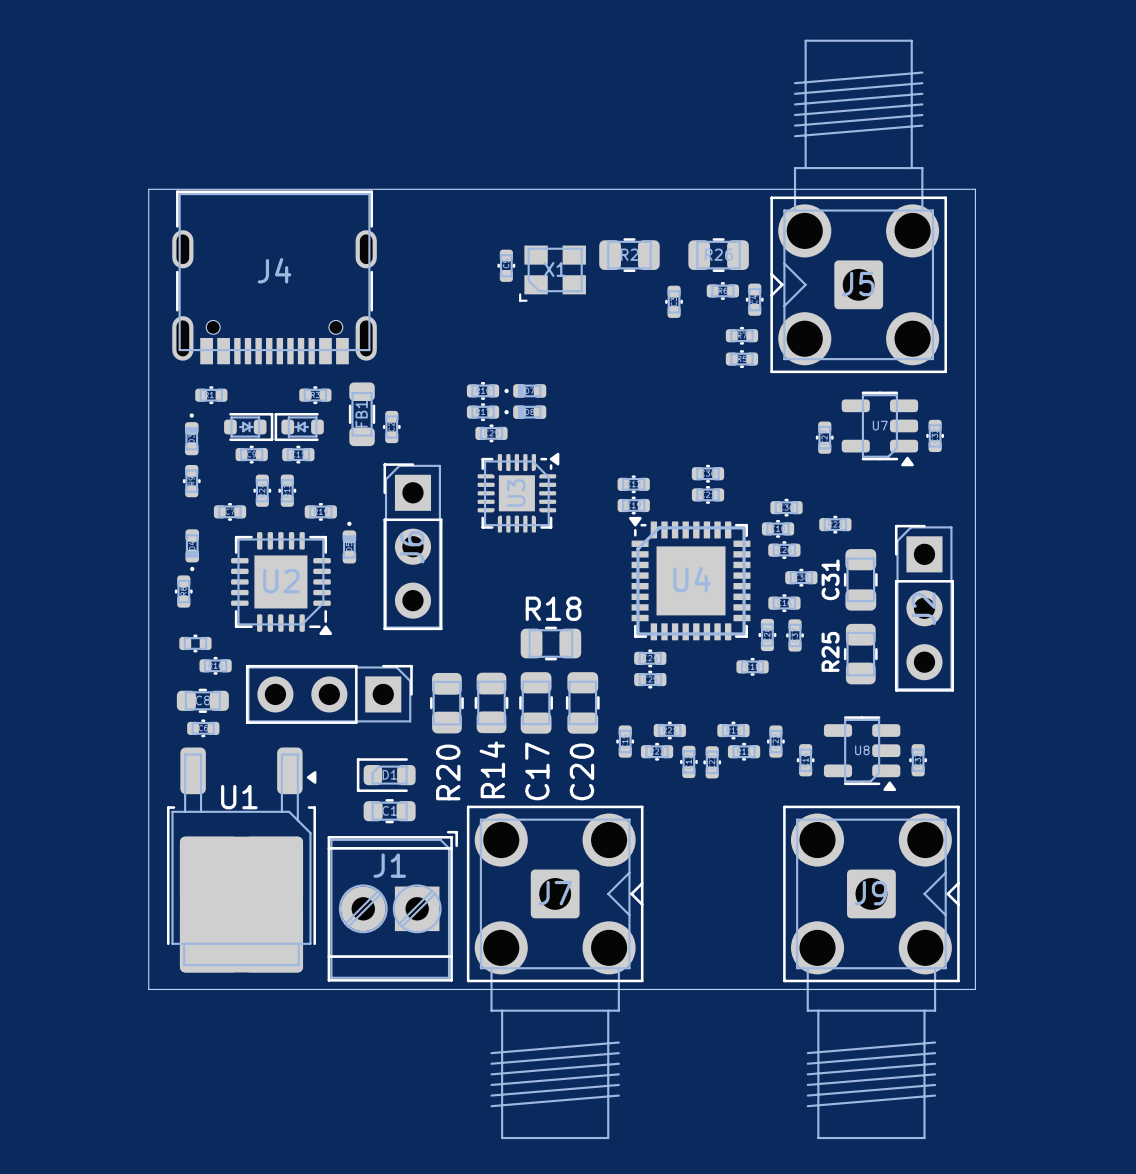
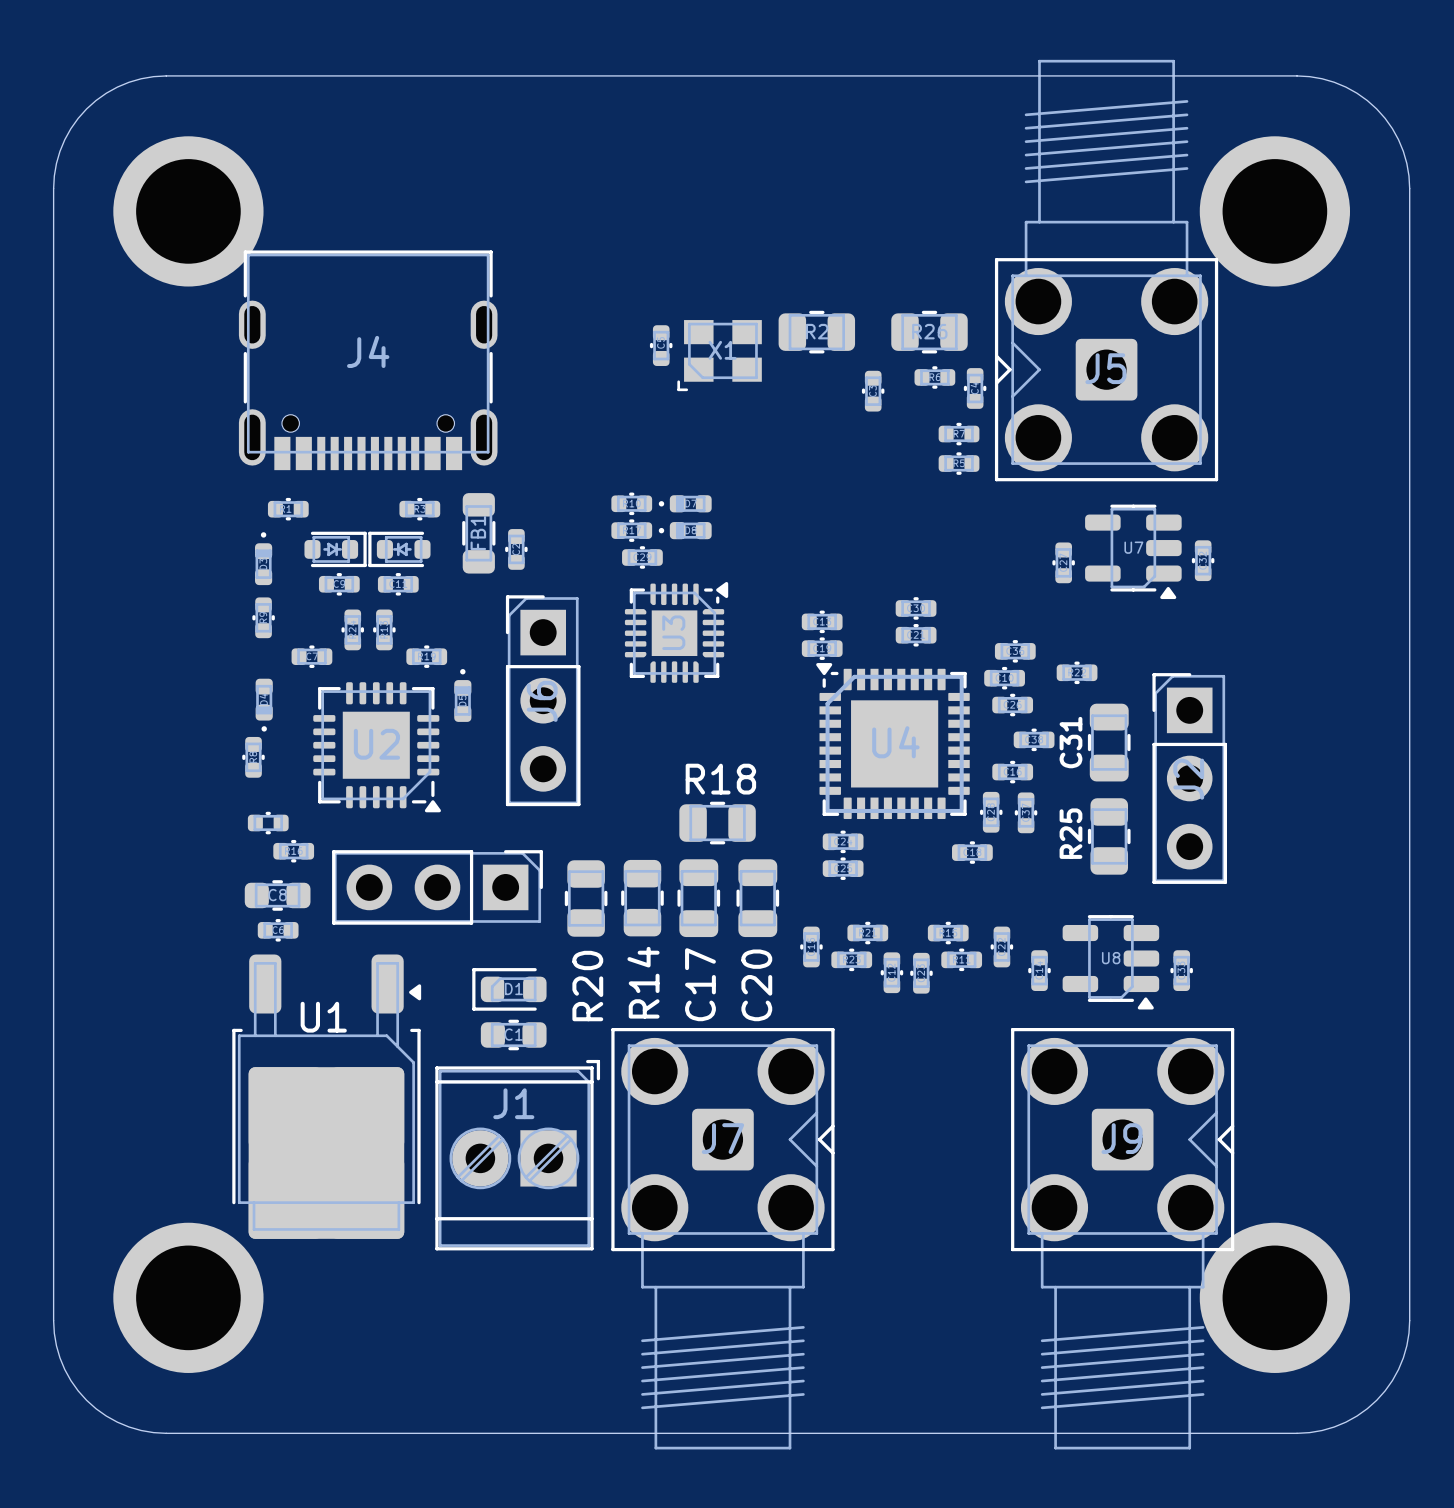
part: none -> (188, 211)
part: none -> (1274, 211)
board edge: (148, 189) (975, 189) (975, 989) (148, 989) (148, 189) -> (166, 75) (141, 78) (117, 87) (86, 108) (64, 139) (54, 175) (53, 1320) (59, 1357) (70, 1380) (86, 1400) (106, 1416) (129, 1427) (166, 1433) (1297, 1433) (1322, 1430) (1345, 1422) (1376, 1400) (1398, 1369) (1406, 1345) (1409, 1320) (1409, 188) (1403, 151) (1392, 128) (1376, 108) (1345, 87) (1322, 78) (1297, 75) (166, 75)
part: none -> (188, 1297)
part: none -> (1274, 1297)

